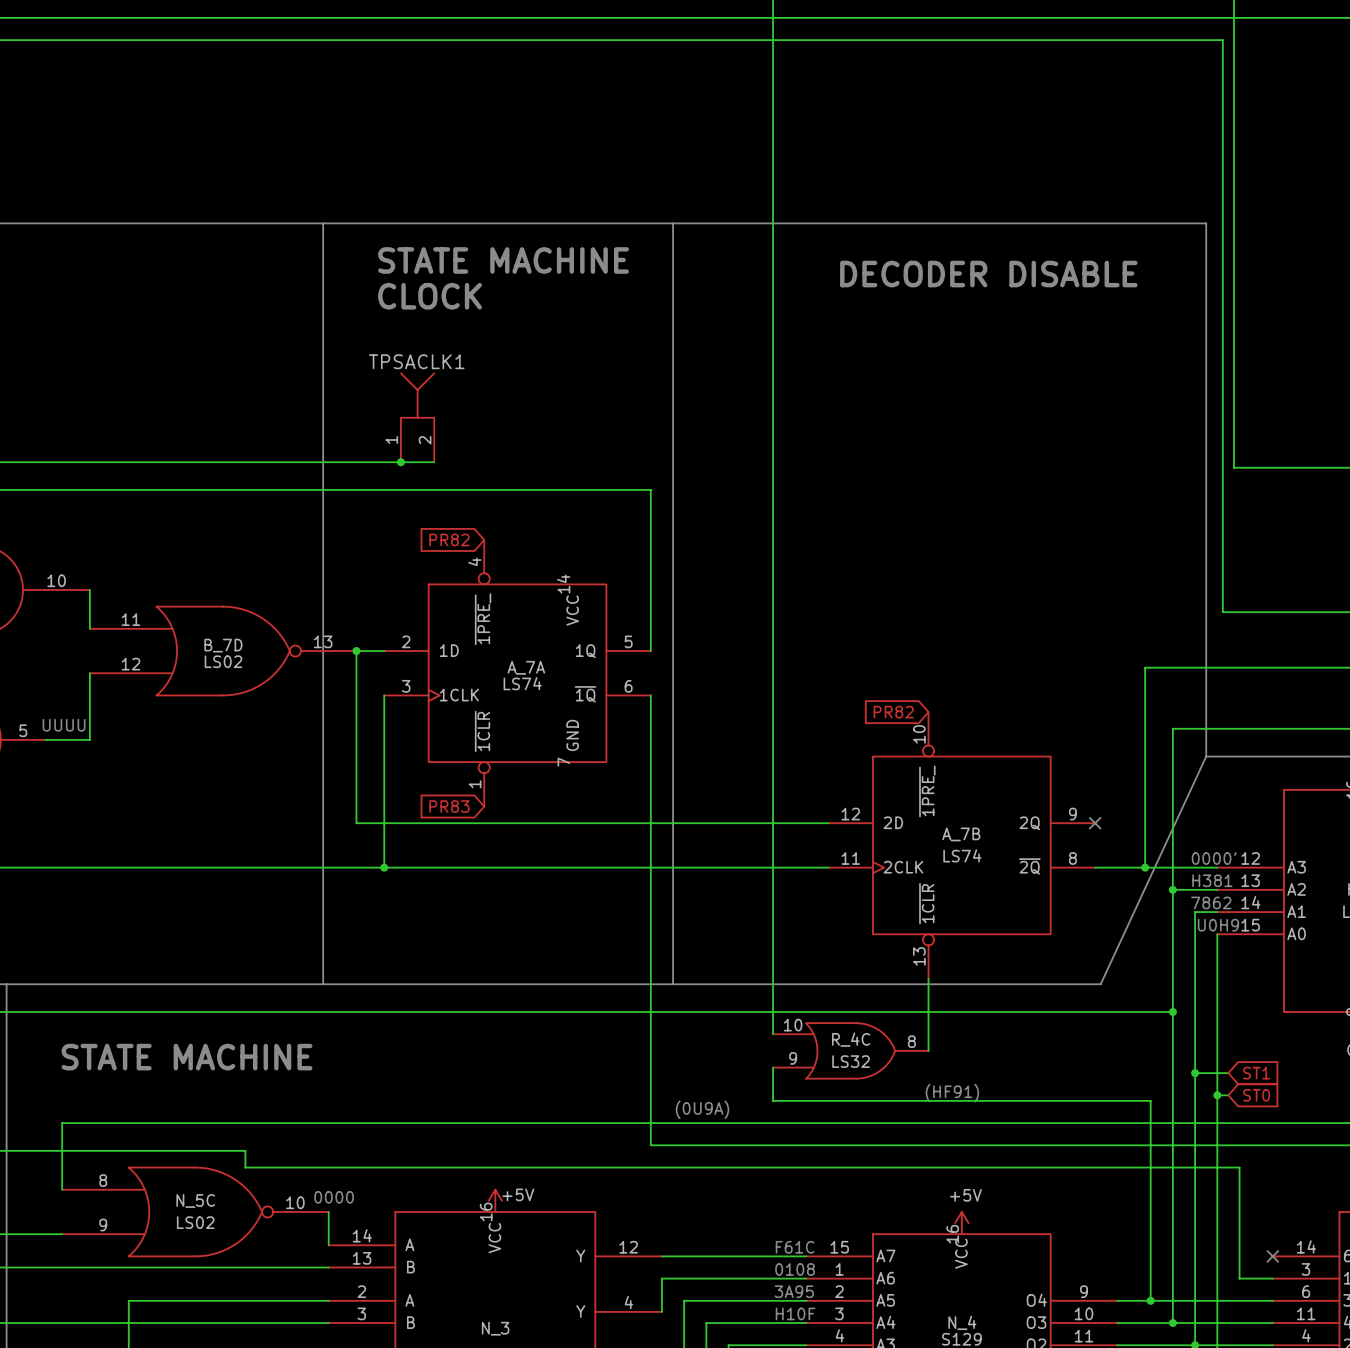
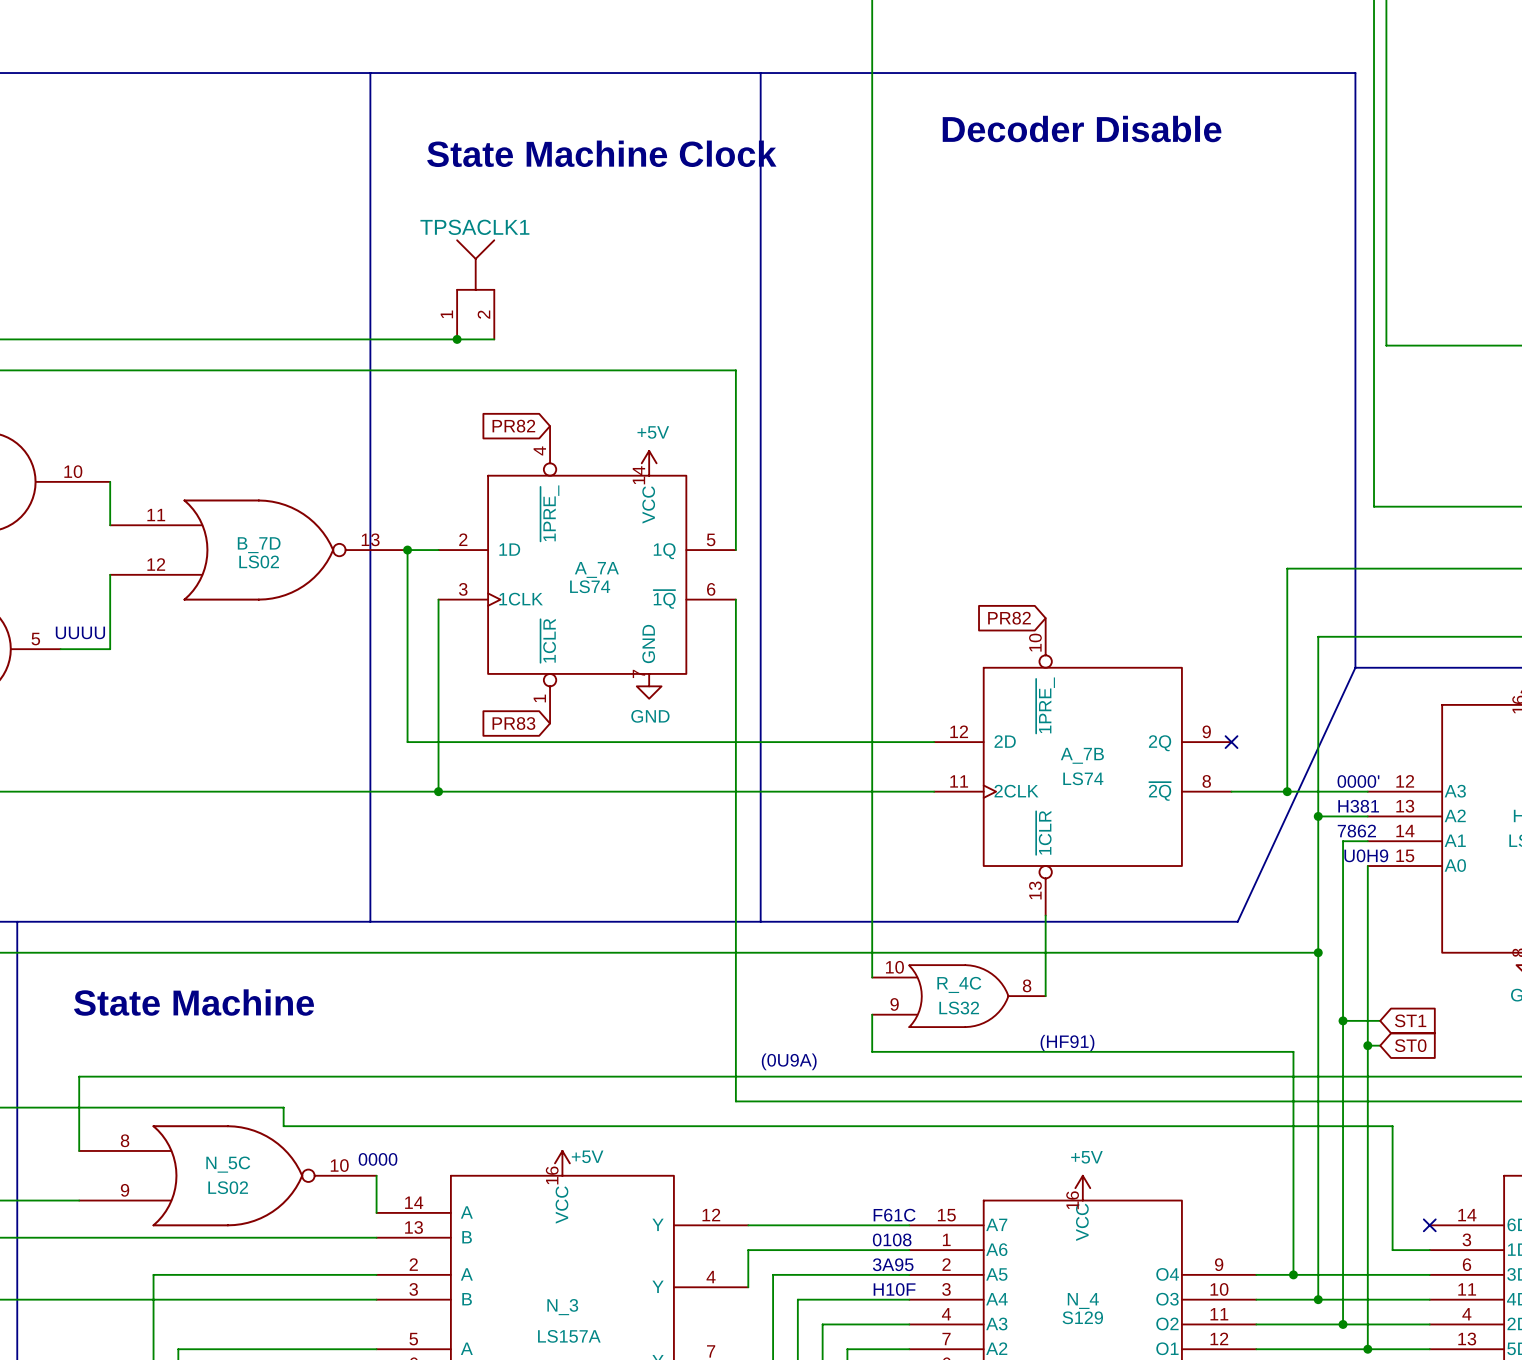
text: STATE MACHINE (503, 260) -> none
text: DECODER DISABLE (988, 274) -> Decoder Disable (1082, 129)
text: CLOCK (430, 296) -> State Machine Clock (601, 153)
power symbol: none -> +5V (649, 463)
power symbol: none -> GND (649, 686)
text: STATE MACHINE (186, 1057) -> State Machine (194, 1002)

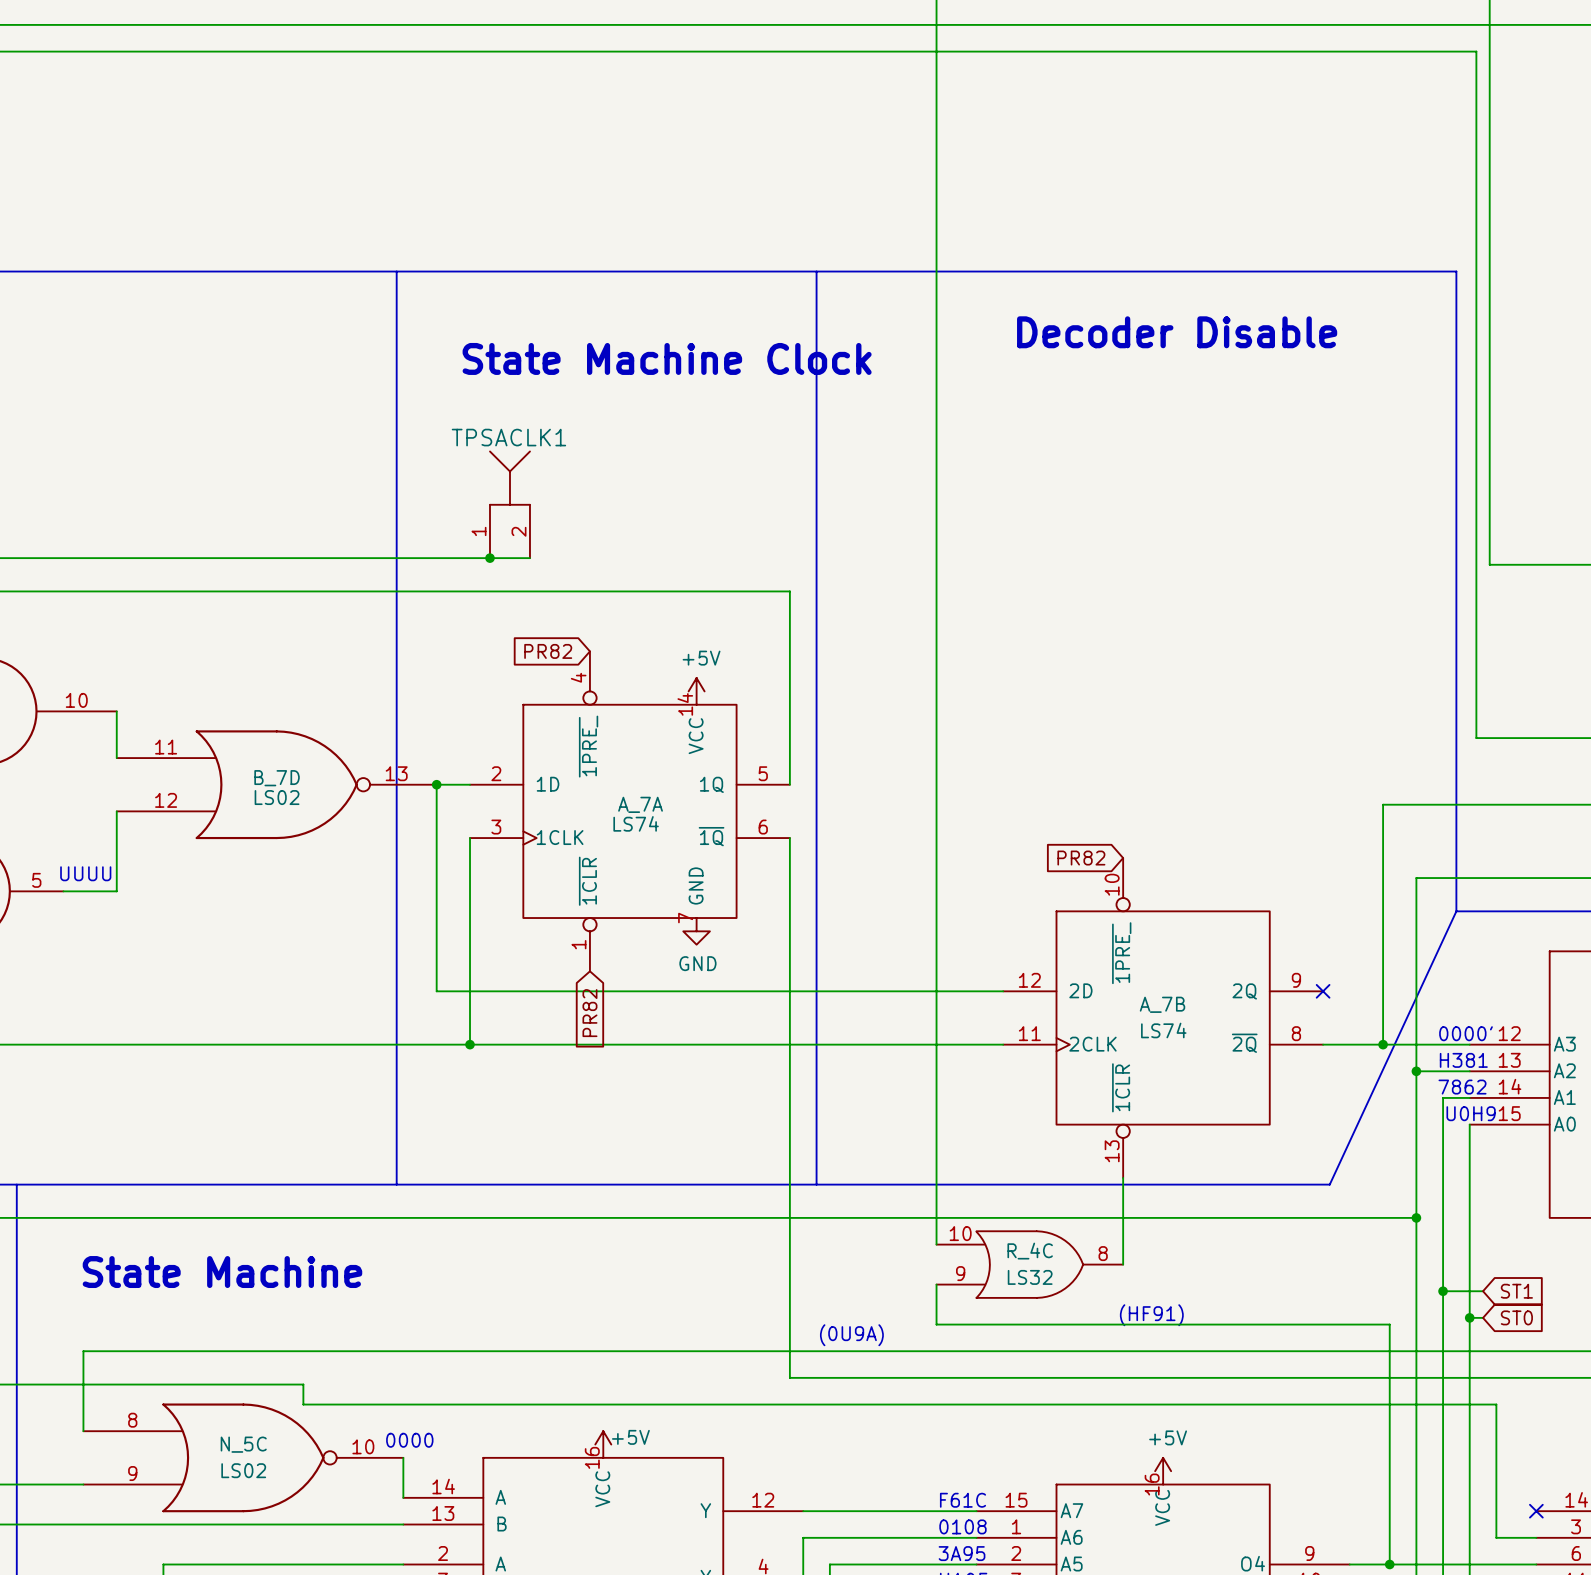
global label: PR83 (513, 723) -> PR82 (589, 1013)

